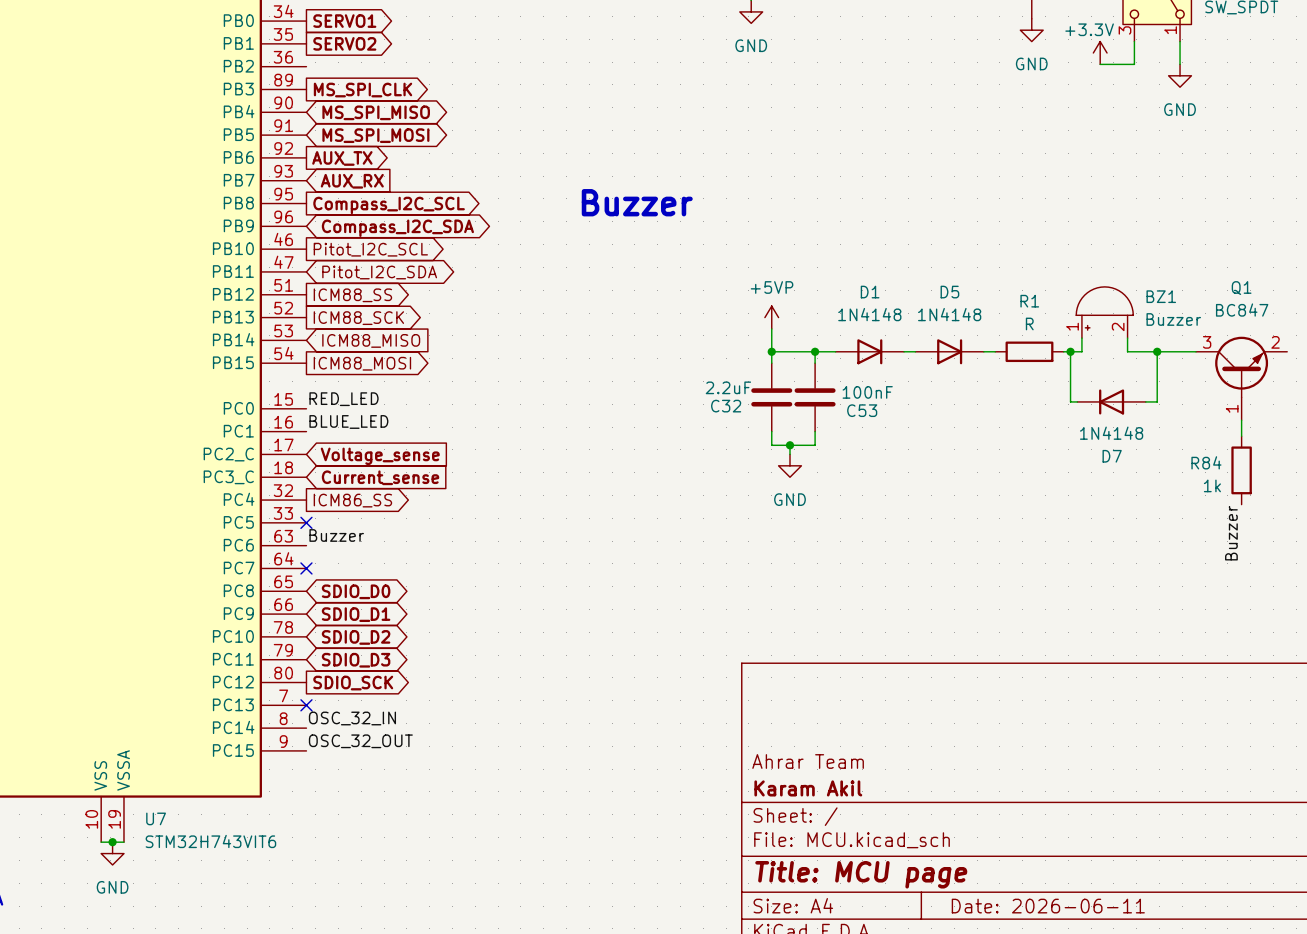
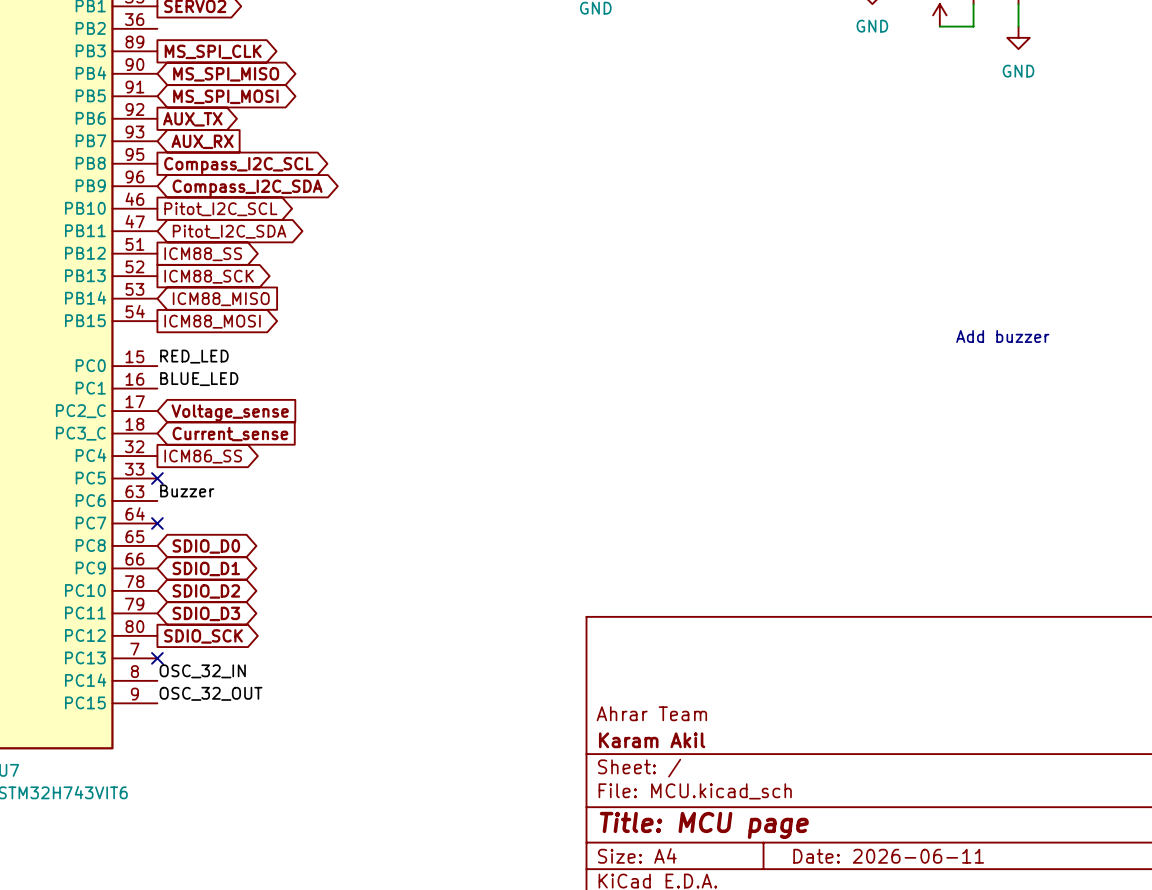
text: Buzzer (637, 202) -> none
BZ1: Buzzer (1104, 312) -> none
power symbol: +5VP (771, 317) -> none
wire: (771, 328) (771, 363) -> none
wire: (1081, 338) (1081, 351) (1063, 351) -> none
wire: (1127, 338) (1127, 351) (1195, 351) -> none
wire: (771, 351) (835, 351) -> none
junction: (771, 351) -> none
wire: (815, 351) (815, 363) -> none
junction: (815, 351) -> none
D1: 1N4148 (869, 351) -> none
wire: (904, 351) (915, 351) -> none
D5: 1N4148 (949, 351) -> none
wire: (983, 351) (995, 351) -> none
R1: R (1029, 351) -> none
wire: (1070, 351) (1070, 401) (1077, 401) -> none
junction: (1070, 351) -> none
wire: (1157, 351) (1157, 401) (1145, 401) -> none
junction: (1157, 351) -> none
text: none -> Add buzzer (1002, 336)
Q1: BC847 (1241, 378) -> none
C32: 2.2uF (771, 397) -> none
C53: 100nF (815, 397) -> none
D7: 1N4148 (1111, 401) -> none
wire: (1241, 420) (1241, 436) -> none
wire: (771, 431) (771, 445) (815, 445) (815, 431) -> none
wire: (789, 445) (789, 454) -> none
junction: (789, 445) -> none
power symbol: GND (789, 465) -> none
R84: 1k (1241, 470) -> none
label: Buzzer (1231, 533) -> none

